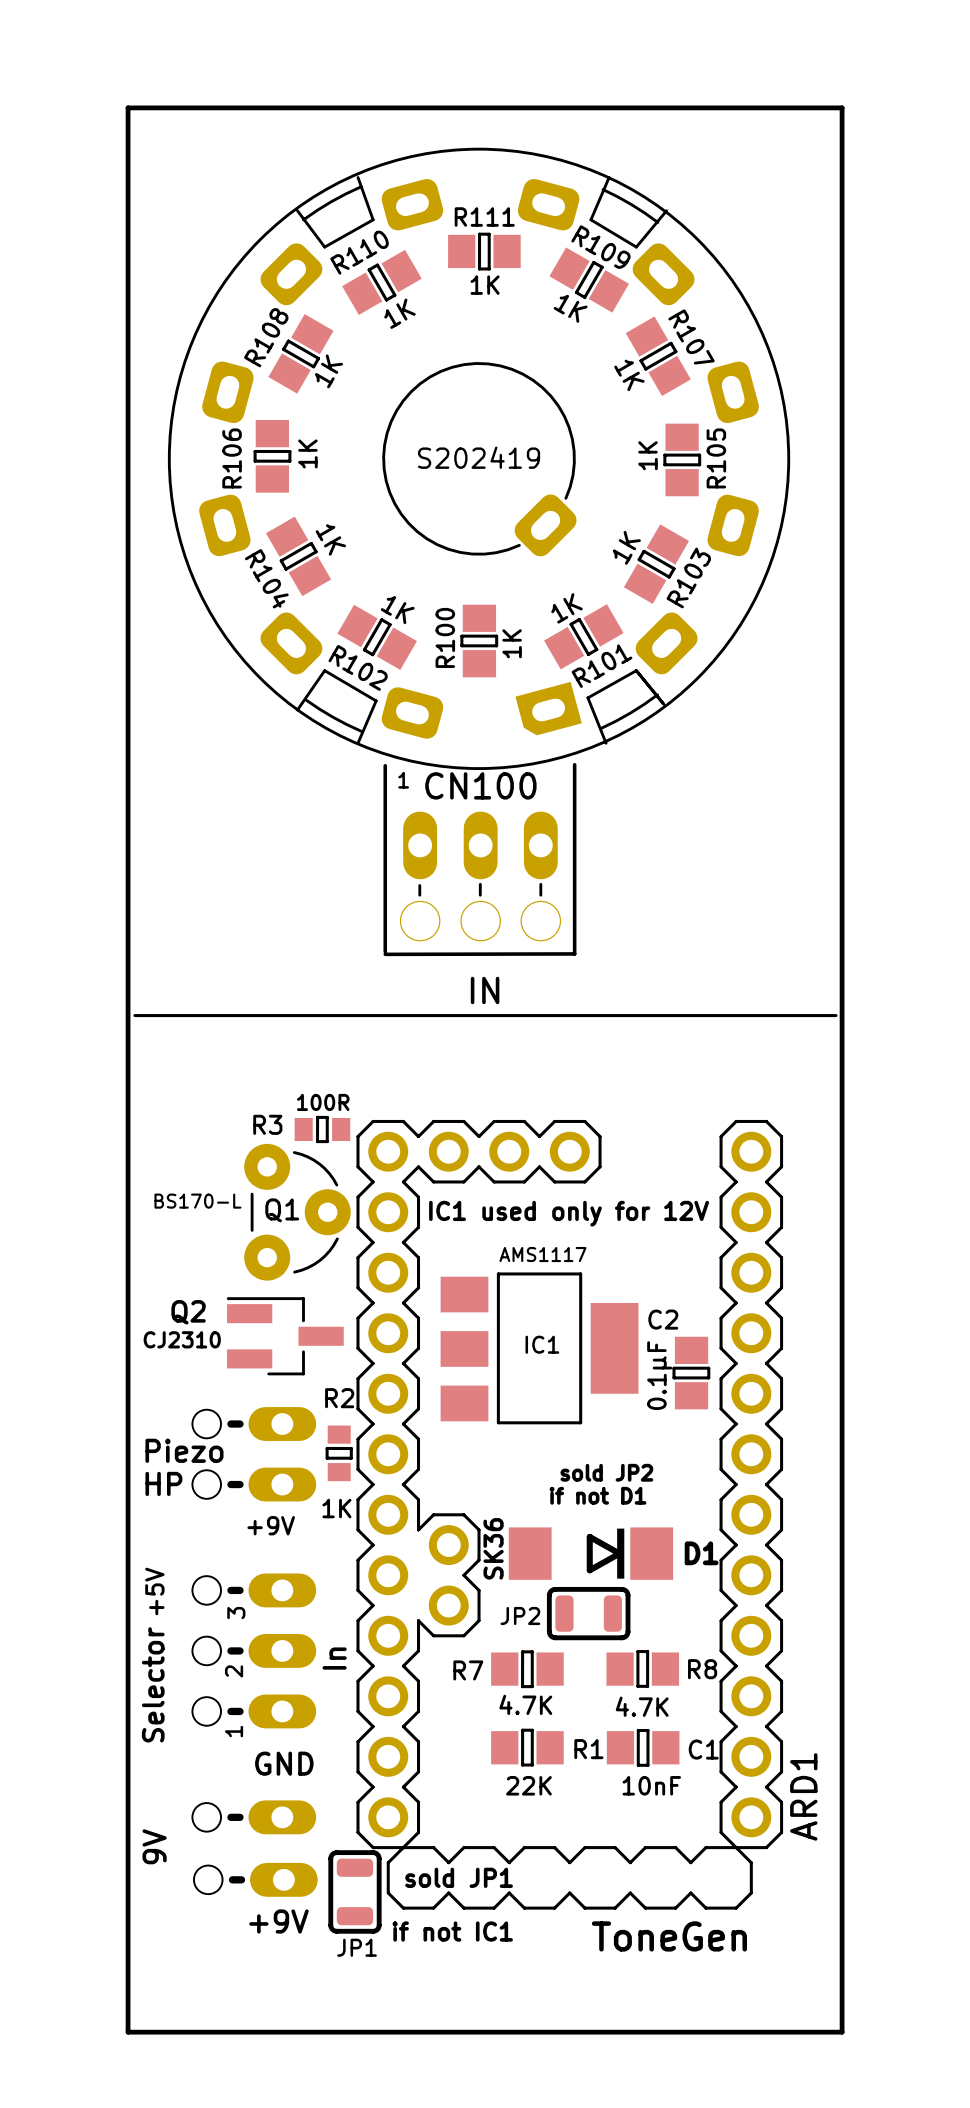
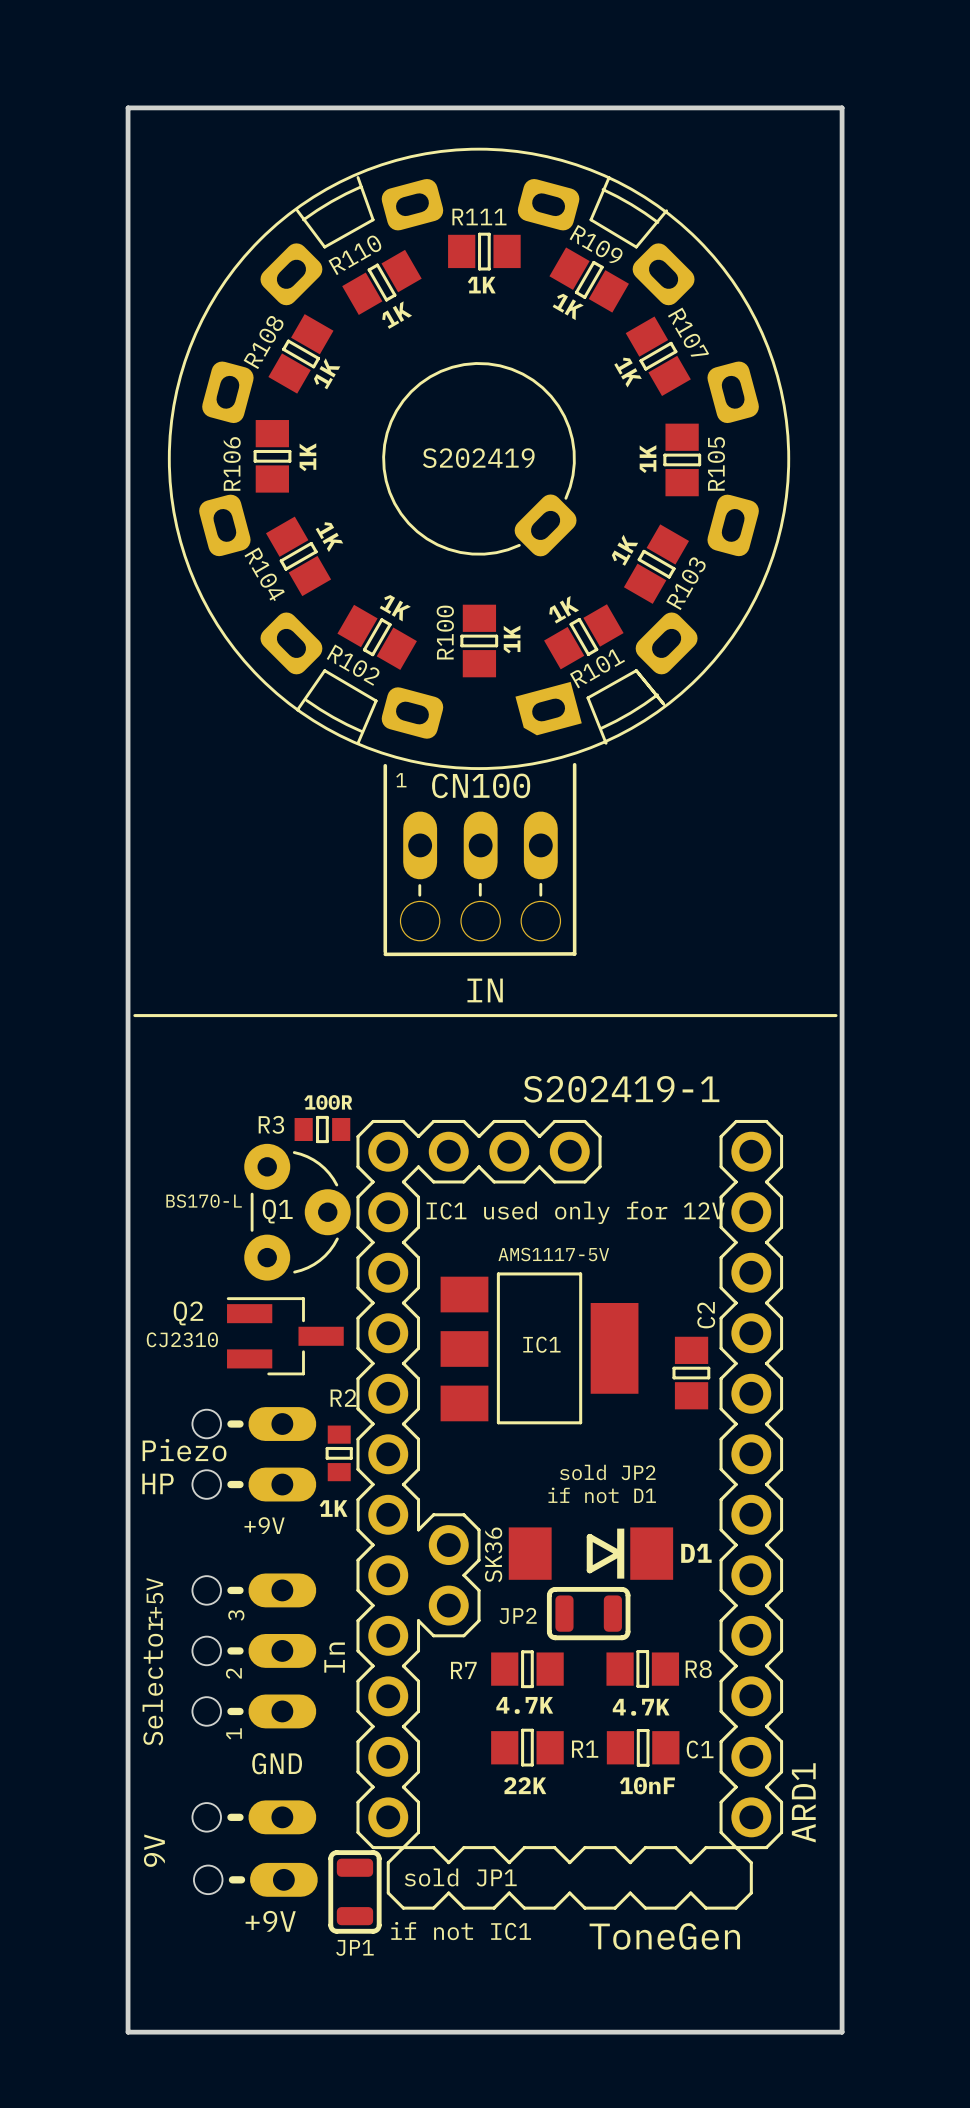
text: none -> S202419-1 (621, 1089)
IC1 value: AMS1117 (542, 1254) -> AMS1117-5V (553, 1254)
C2 name rotation: 0° (663, 1319) -> 90° counterclockwise (706, 1315)
C2 value: 0.1µF (659, 1375) -> none

